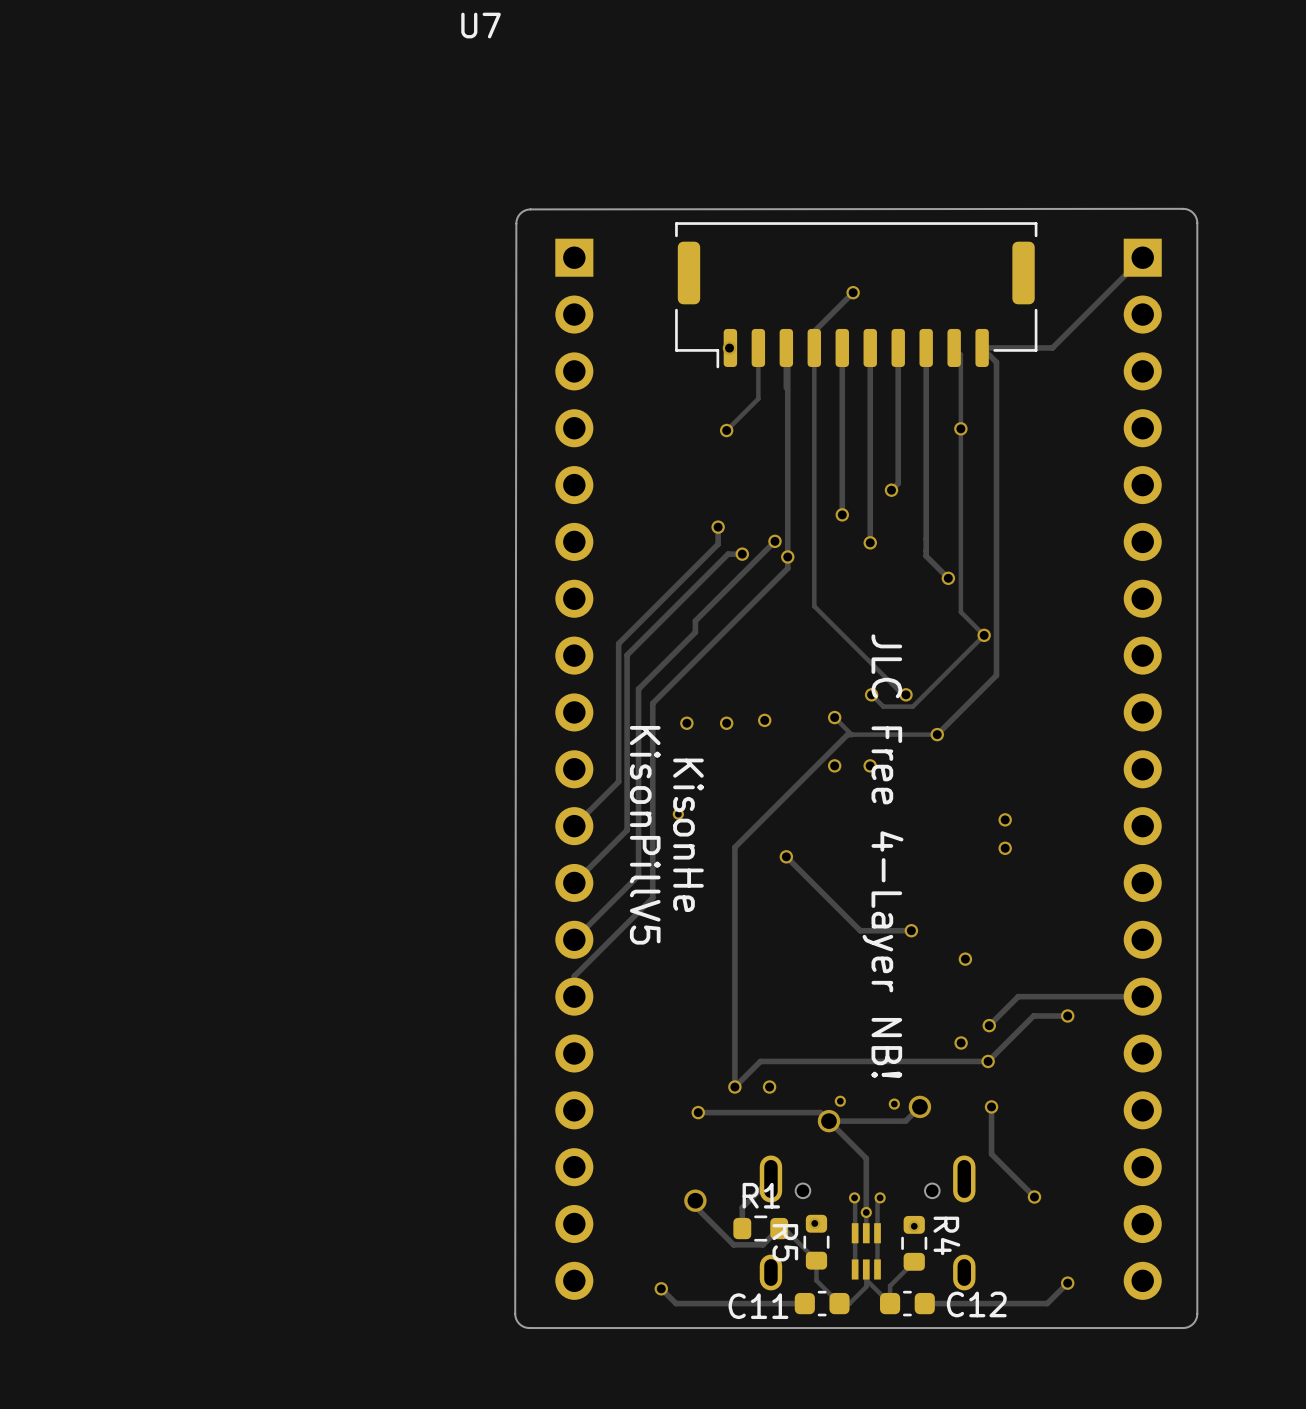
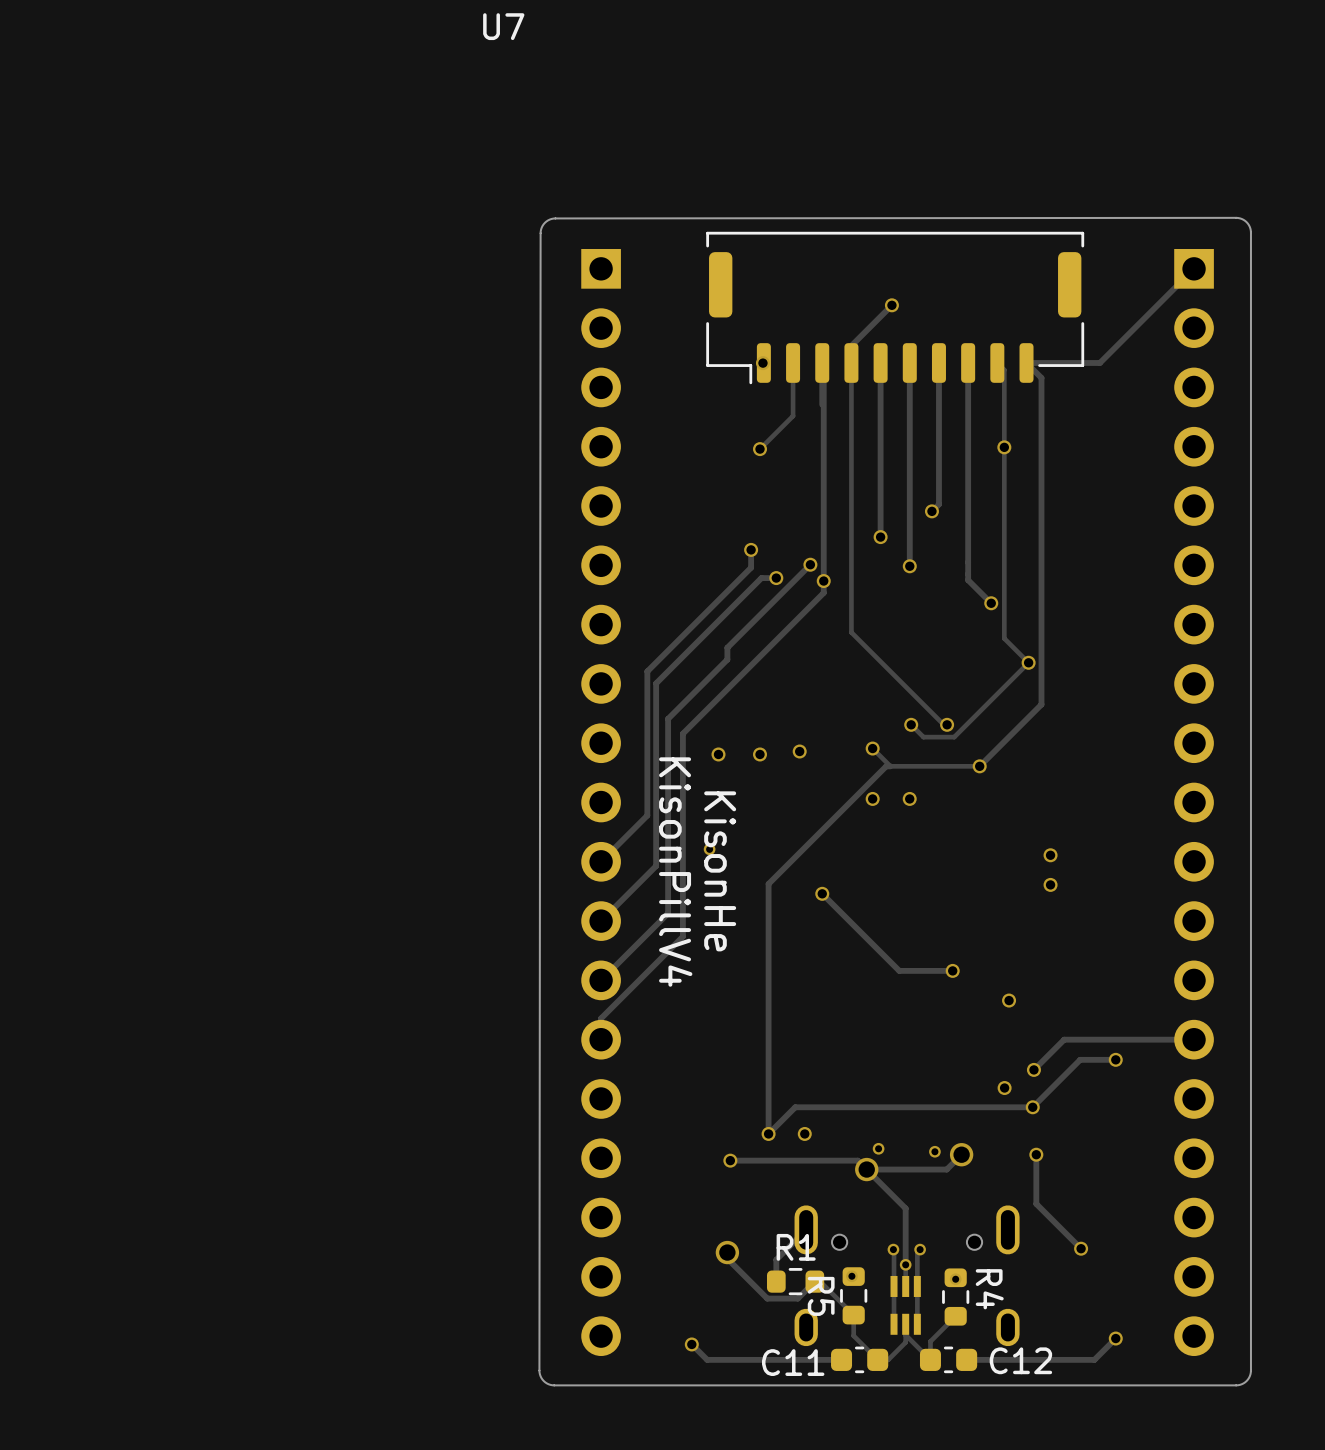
text: KisonPillV5 (645, 835) -> KisonPillV4 (675, 872)
text: JLC Free 4-Layer NB! (882, 856) -> none

